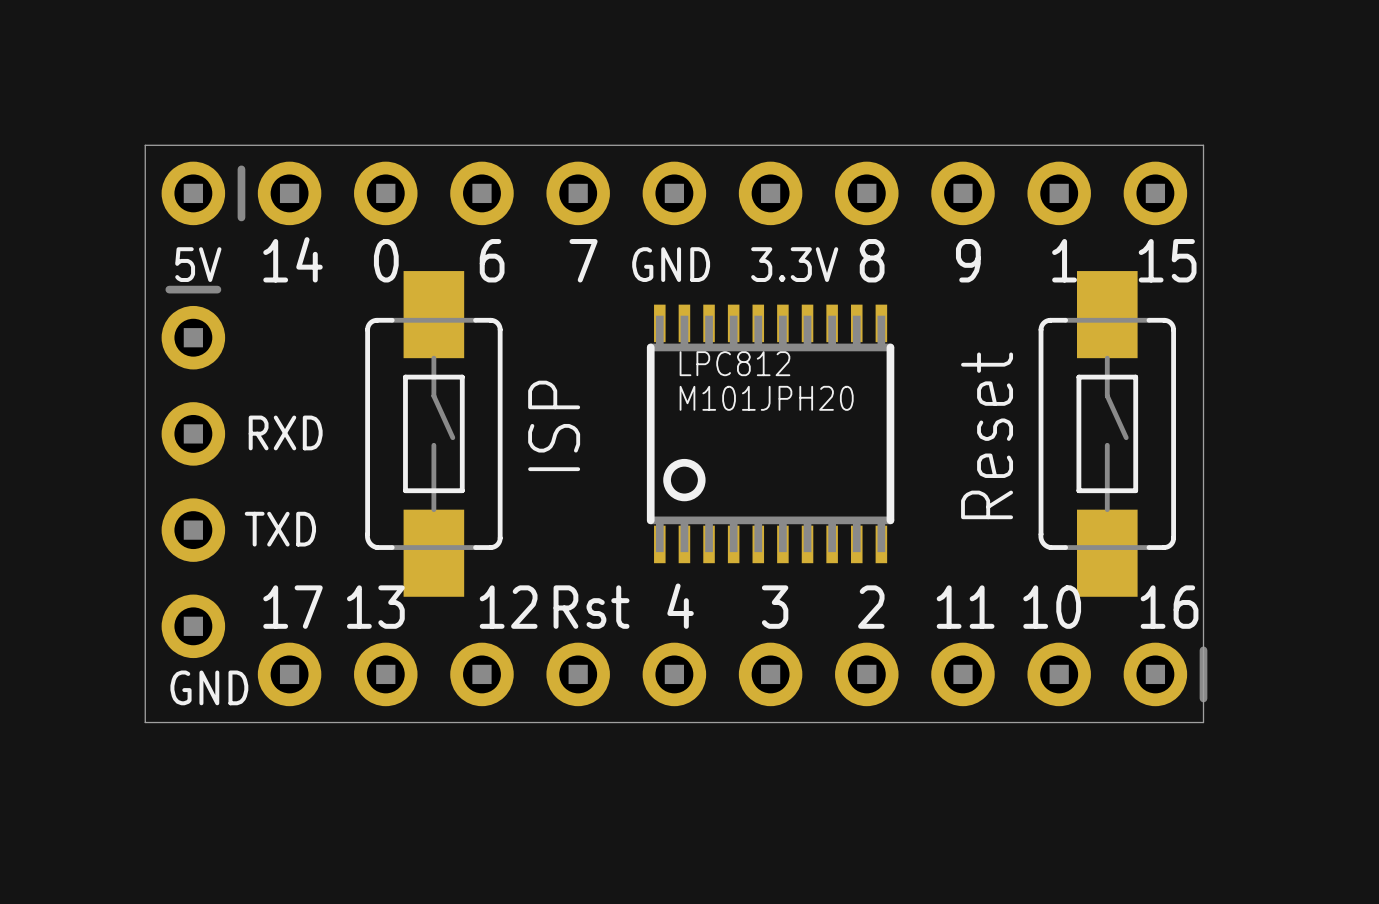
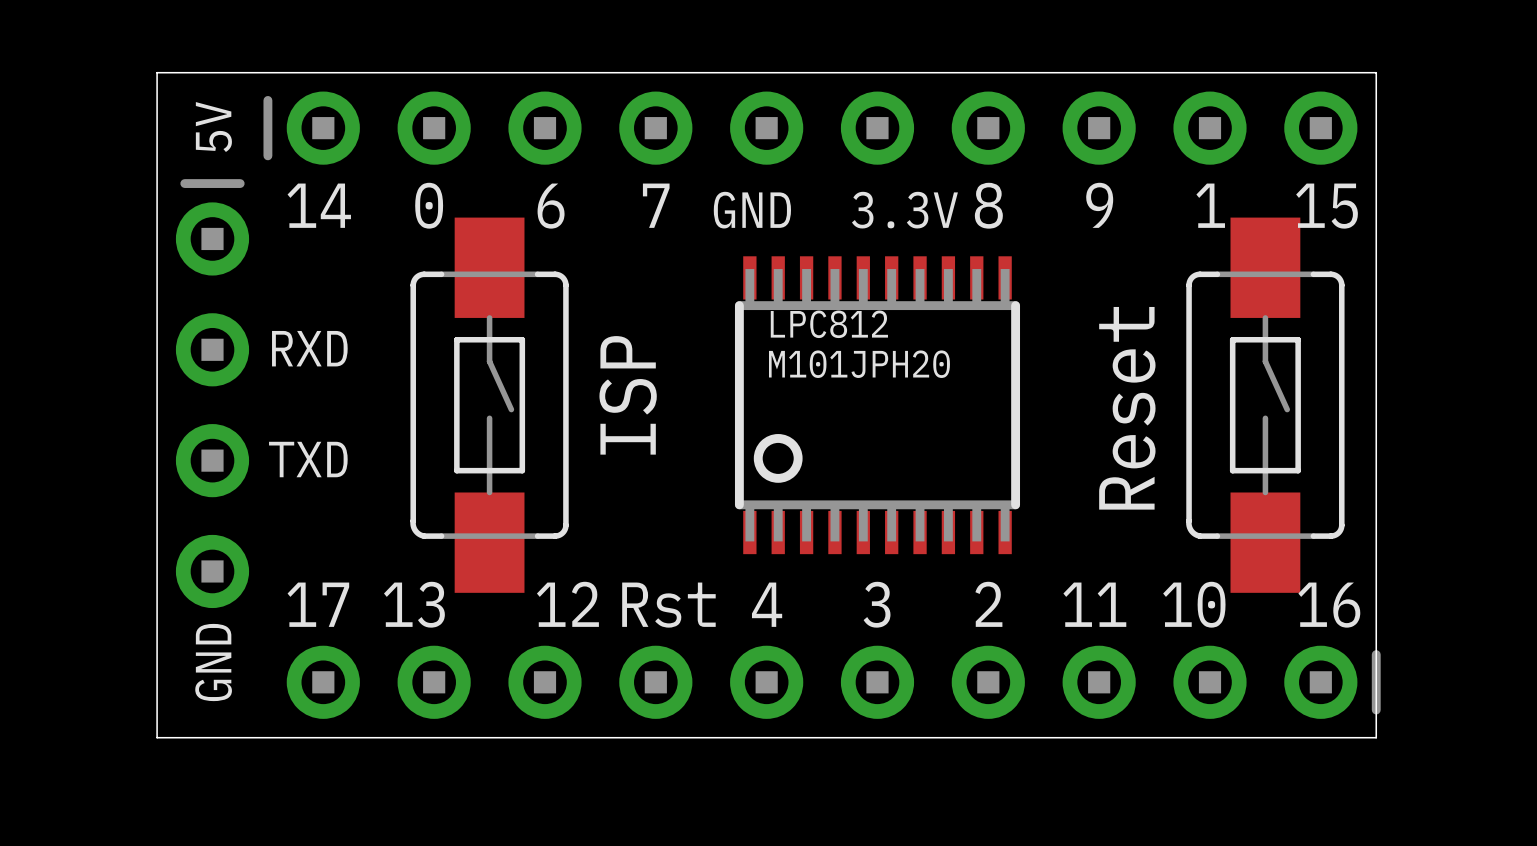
part: (193, 193) -> none
text rotation: 0° (198, 264) -> 90° counterclockwise (213, 127)
text position: RXD (285, 432) -> RXD (309, 348)
part position: (193, 471) -> (212, 393)
text position: TXD (280, 529) -> TXD (308, 459)
text rotation: 0° (209, 687) -> 90° counterclockwise (213, 662)

